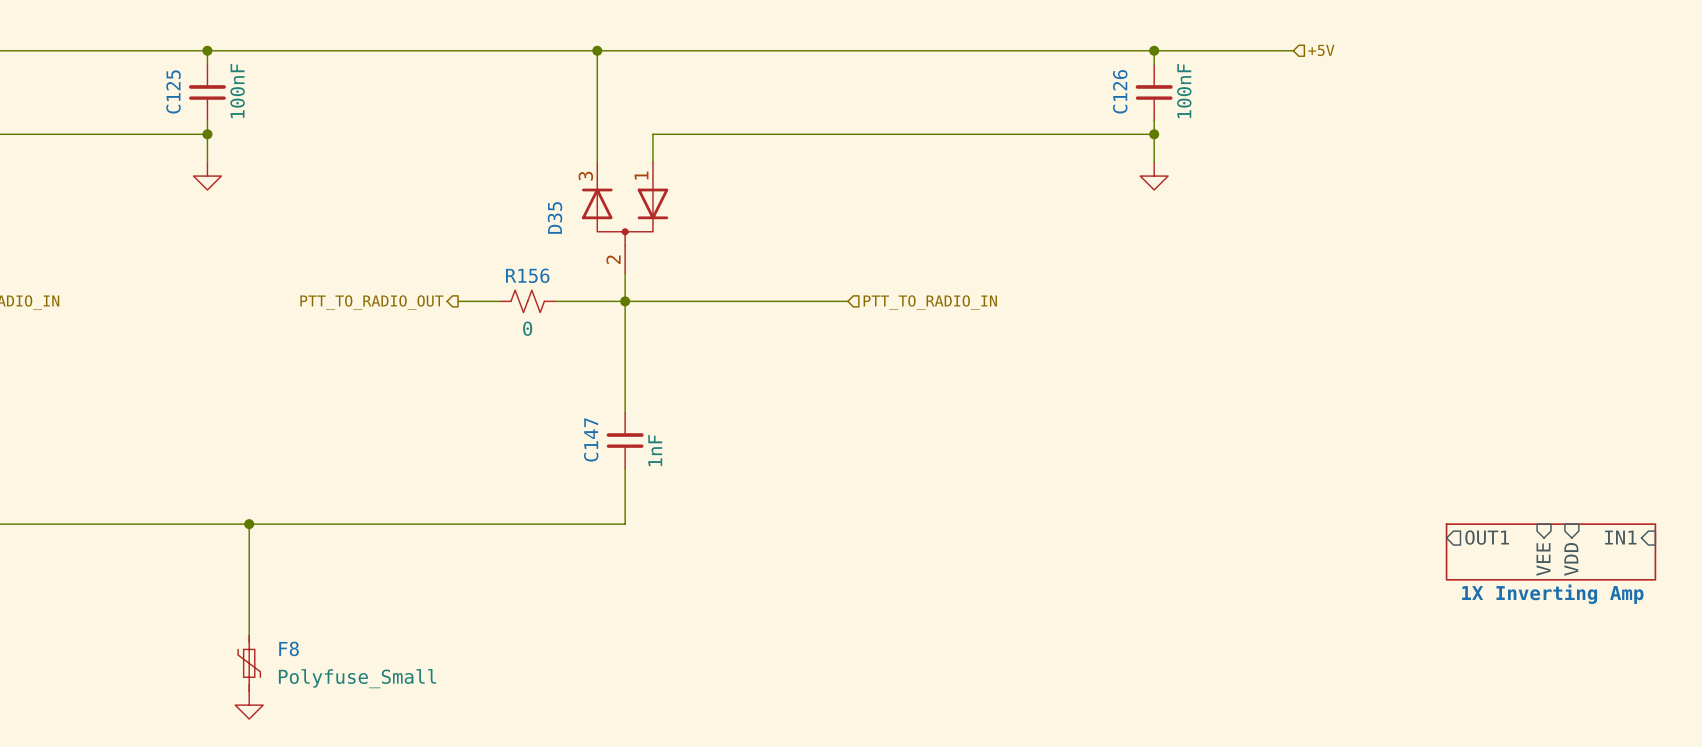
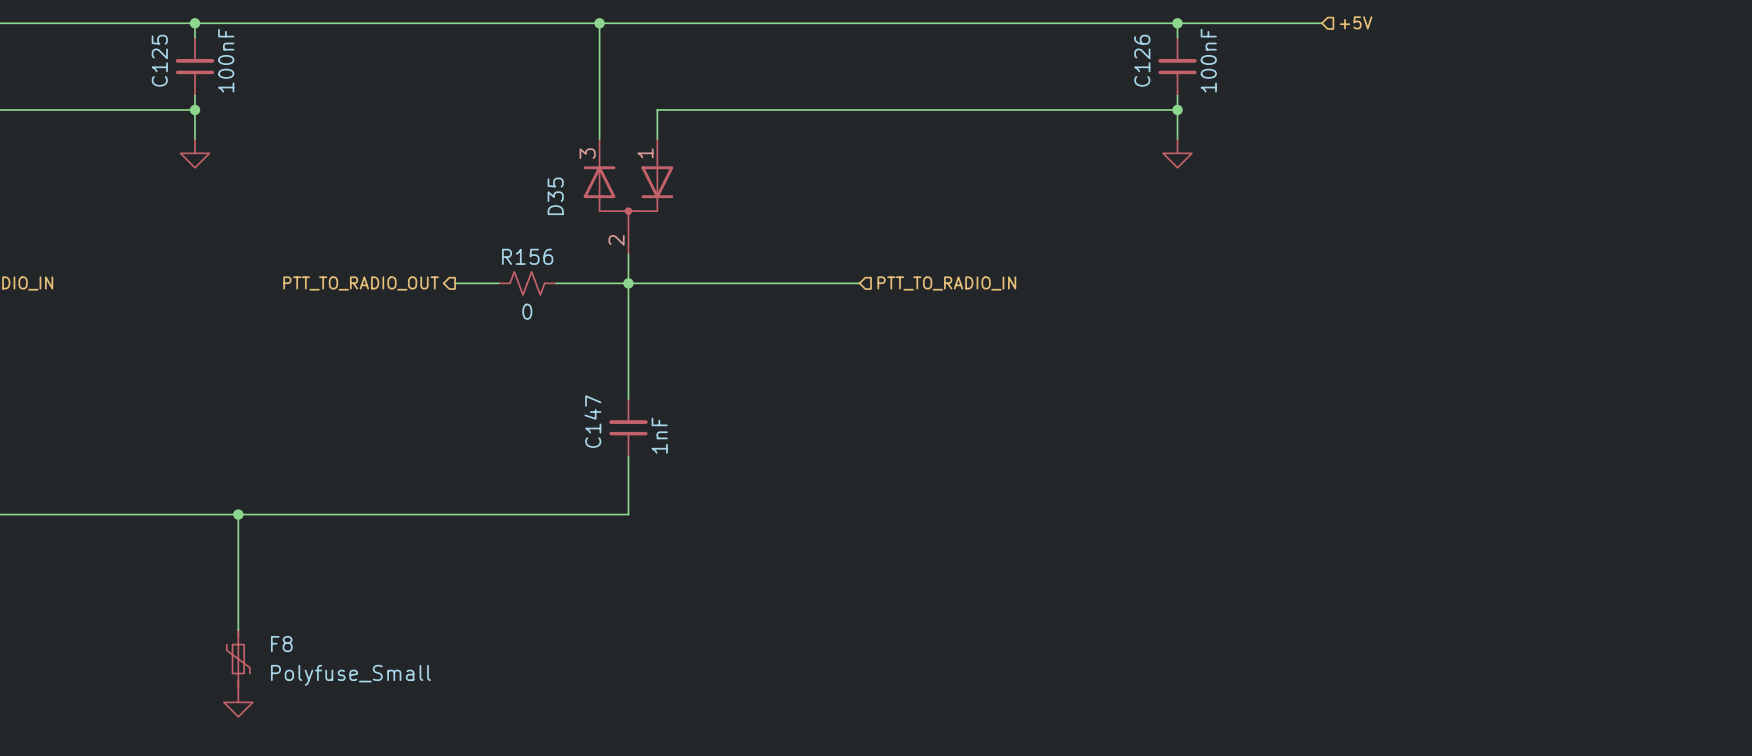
sheet pin: OUT1 (1487, 537) -> none
sheet pin: IN1 (1620, 537) -> none
sheet 1X Inverting Amp: (1550, 551) -> none
sheet pin: VEE (1543, 559) -> none
sheet pin: VDD (1571, 559) -> none

